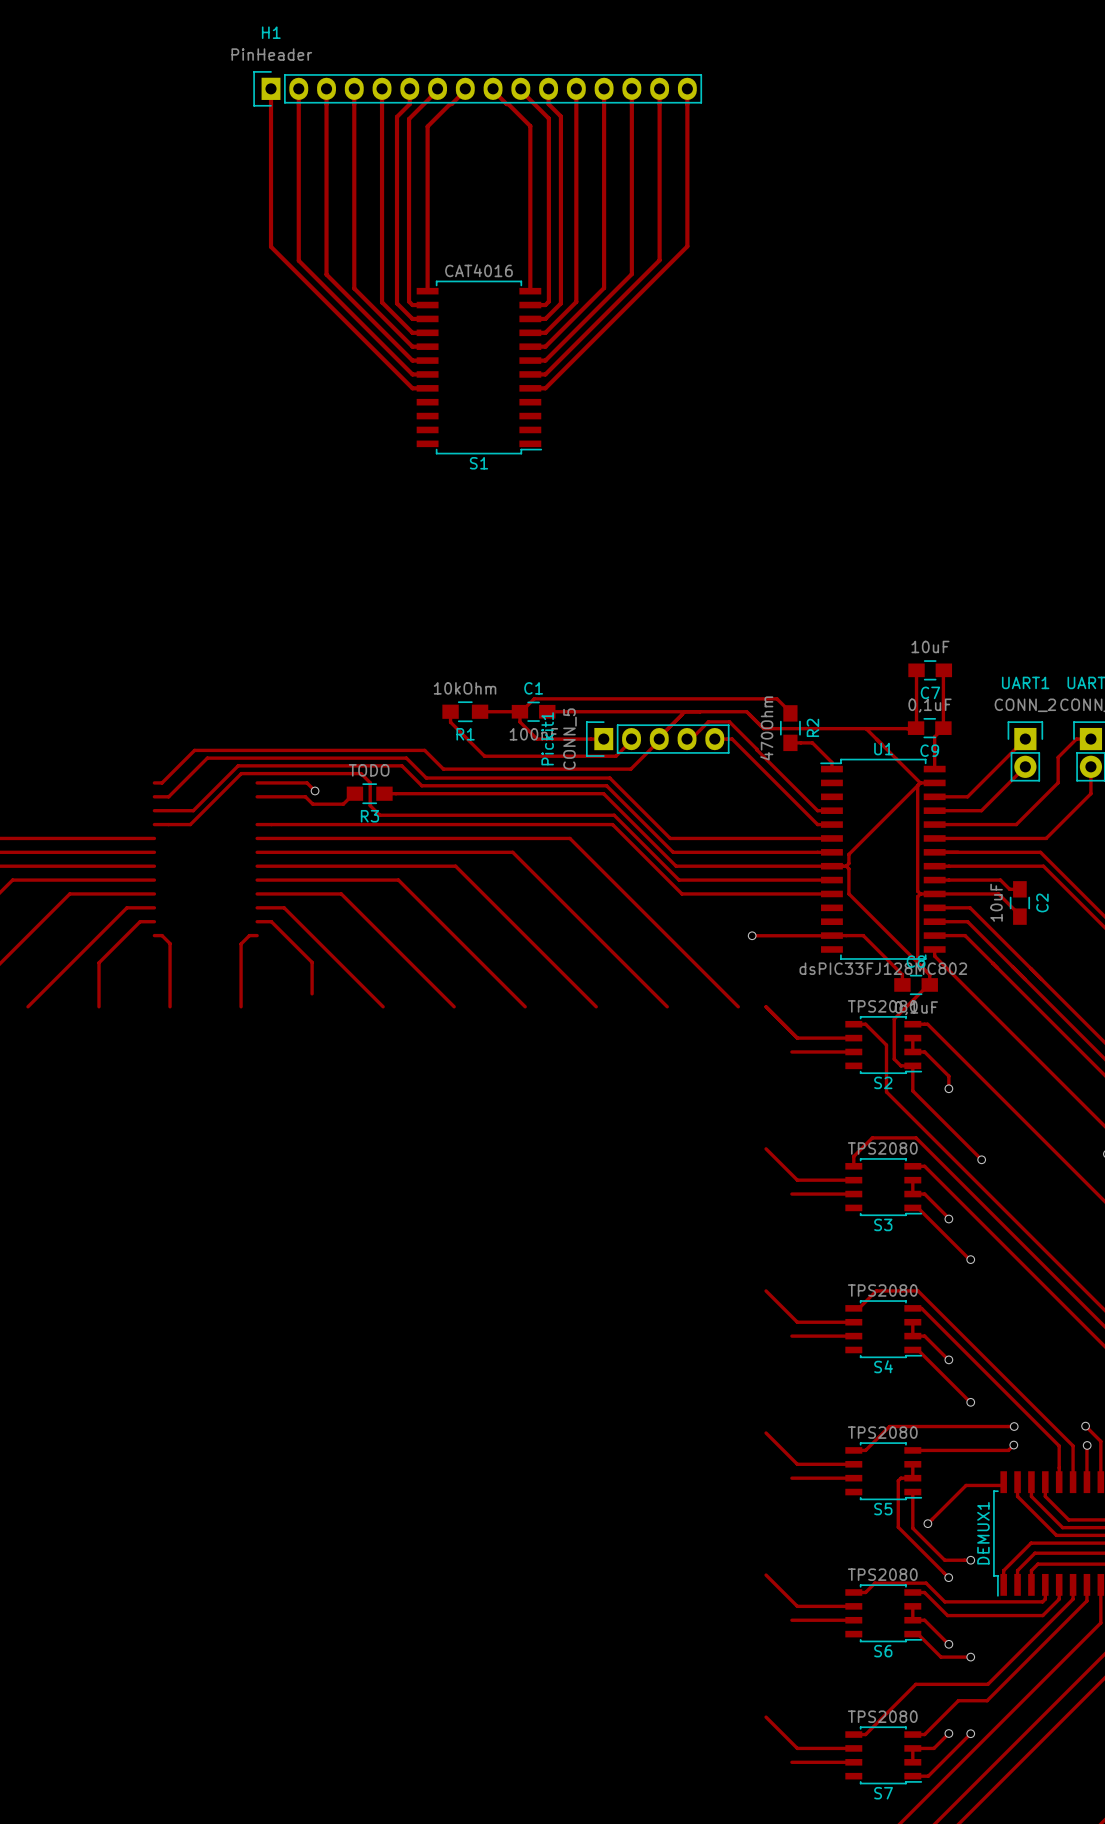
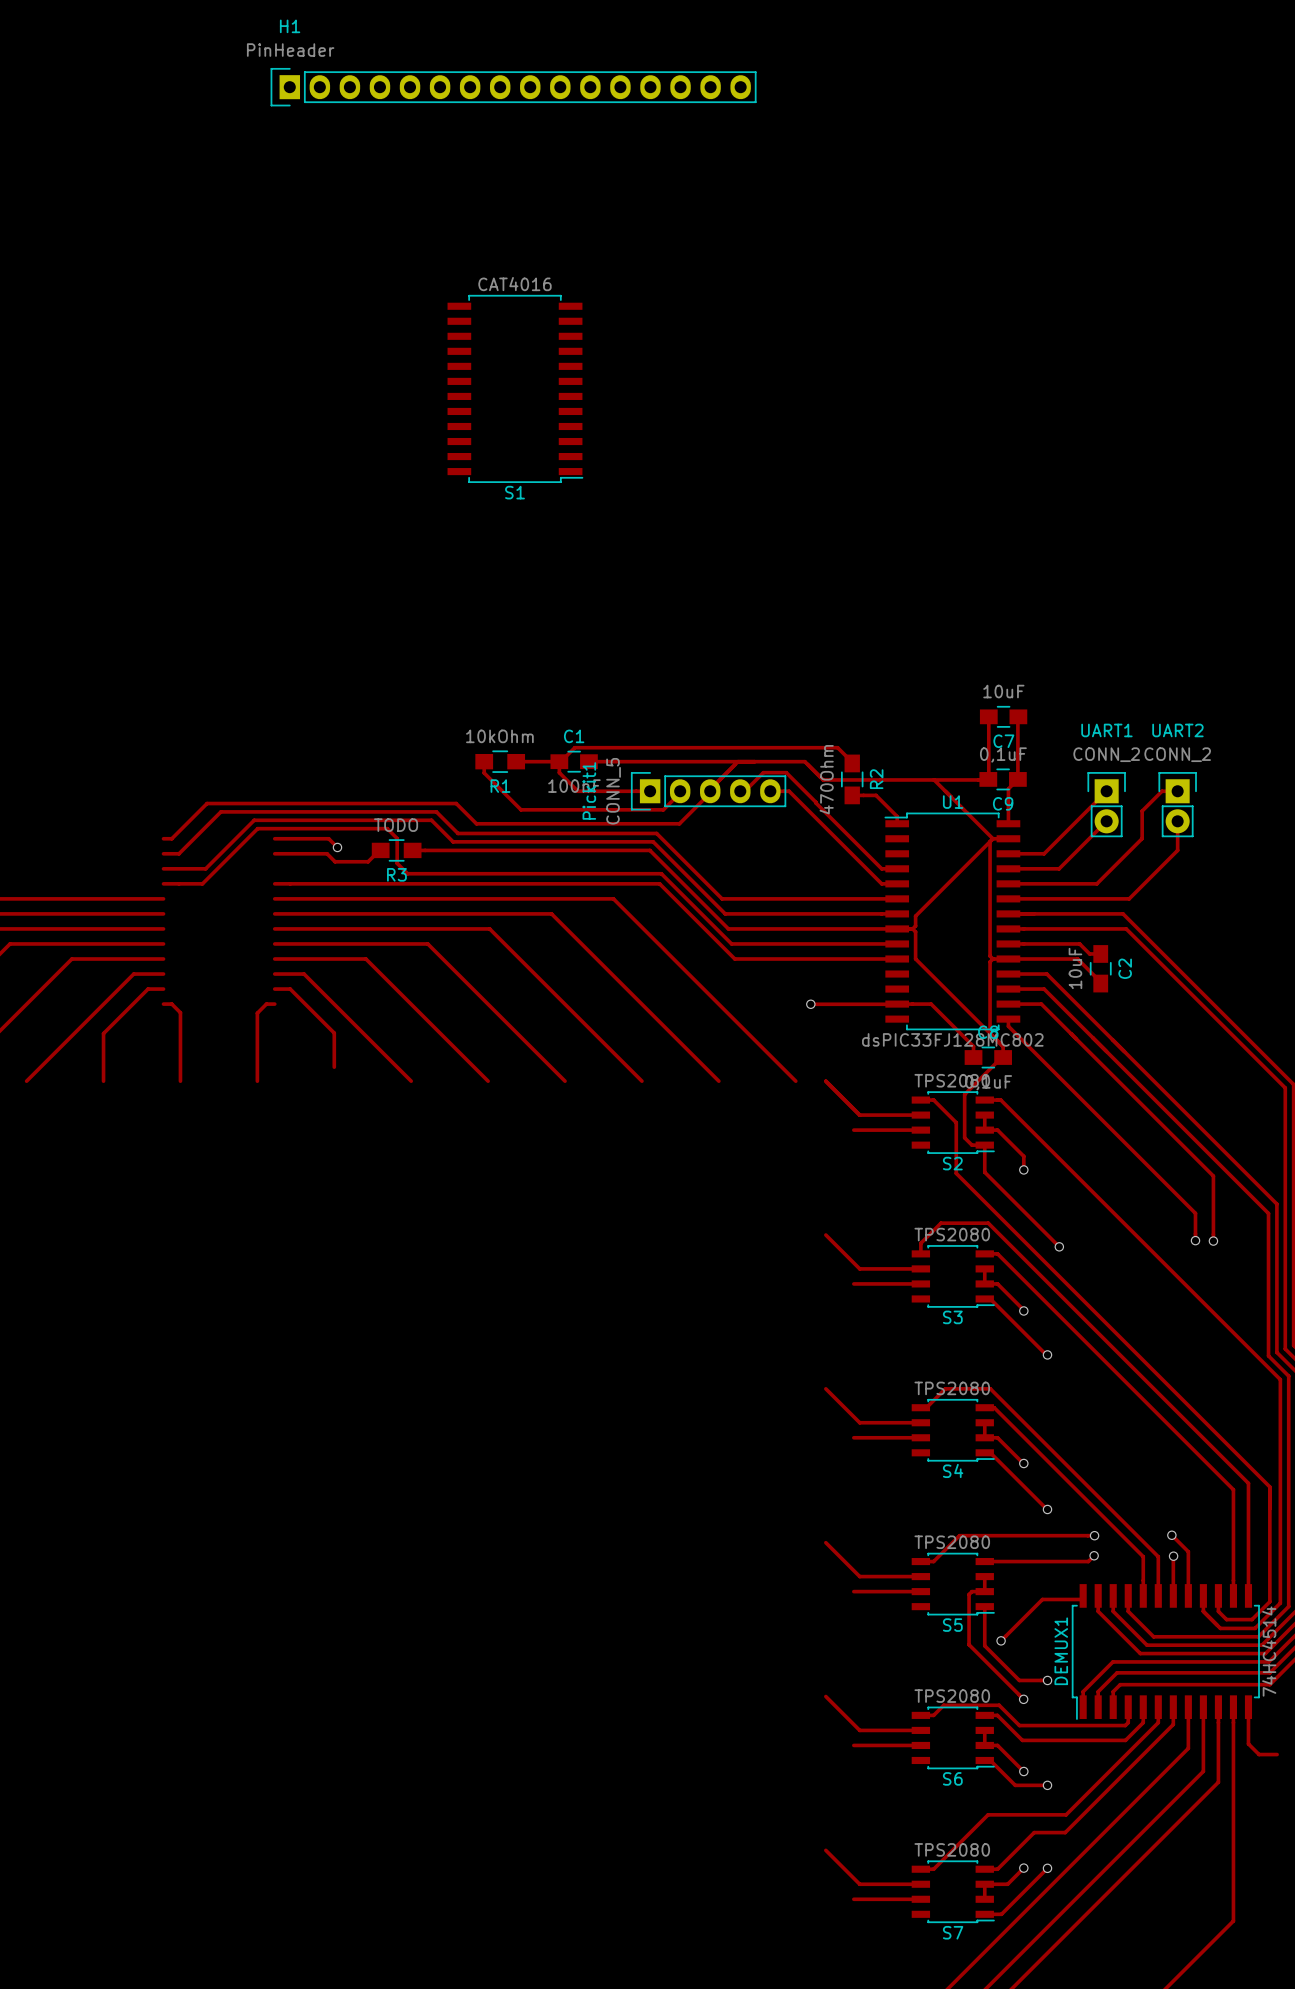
track: (271, 88) (271, 246) (412, 388) (427, 388) -> none
track: (298, 88) (298, 260) (412, 374) (427, 374) -> none
track: (326, 88) (326, 274) (412, 360) (427, 360) -> none
track: (354, 88) (354, 288) (412, 346) (427, 346) -> none
track: (382, 88) (382, 302) (412, 332) (427, 332) -> none
track: (409, 88) (409, 104) (397, 116) (397, 303) (412, 318) (427, 318) -> none
track: (437, 88) (409, 119) (409, 301) (412, 305) (427, 305) -> none
track: (465, 88) (427, 126) (427, 291) -> none
track: (493, 88) (530, 126) (530, 291) -> none
track: (520, 88) (548, 118) (548, 301) (545, 305) (530, 305) -> none
track: (548, 88) (548, 104) (560, 116) (560, 303) (545, 318) (530, 318) -> none
track: (576, 88) (576, 301) (545, 332) (530, 332) -> none
track: (604, 88) (604, 288) (545, 346) (530, 346) -> none
track: (631, 88) (631, 274) (545, 360) (530, 360) -> none
track: (659, 88) (659, 260) (545, 374) (530, 374) -> none
track: (687, 88) (687, 246) (545, 388) (530, 388) -> none

